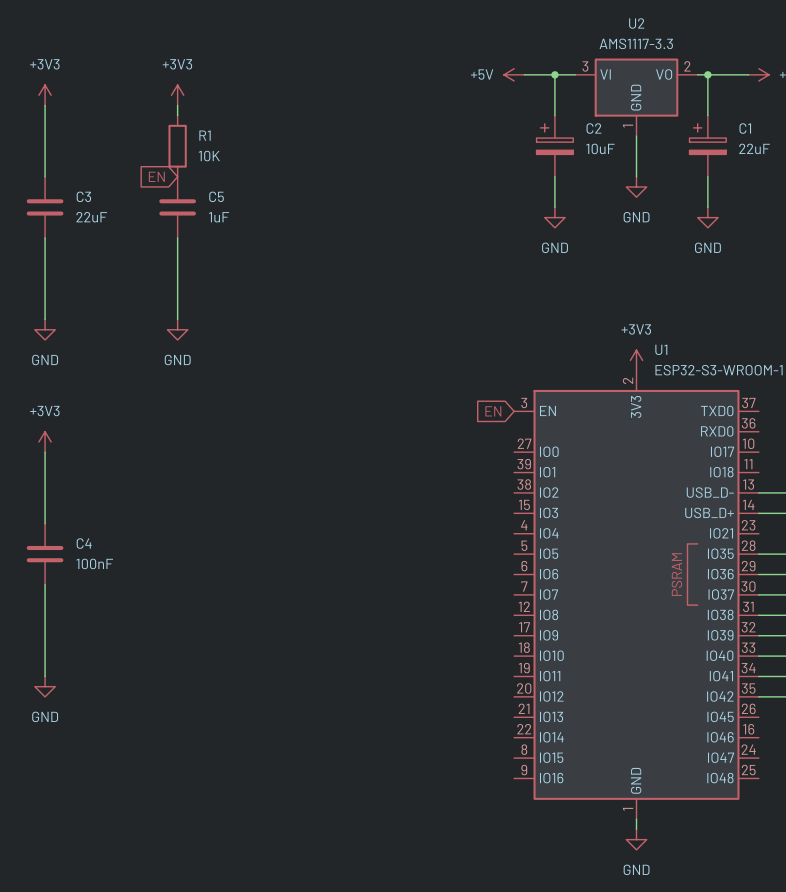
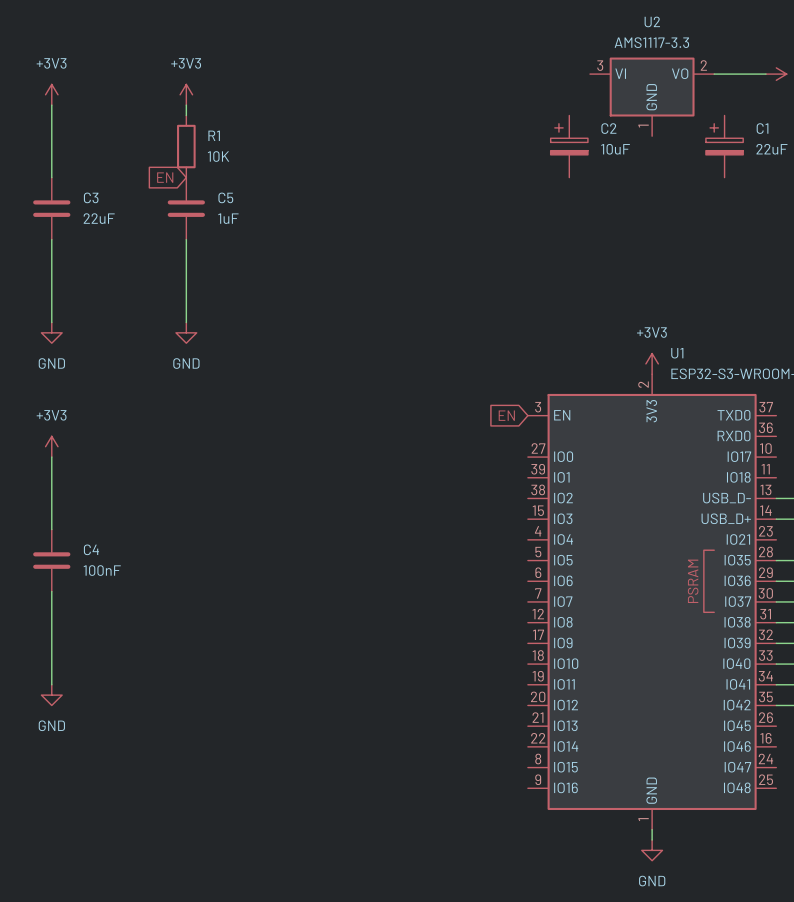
power symbol: +5V (514, 74) -> none
wire: (524, 74) (575, 74) -> none
wire: (554, 74) (554, 115) -> none
junction: (554, 74) -> none
wire: (707, 74) (707, 115) -> none
junction: (707, 74) -> none
wire: (636, 136) (636, 176) -> none
wire: (554, 176) (554, 207) -> none
wire: (707, 176) (707, 207) -> none
power symbol: GND (636, 187) -> none
power symbol: GND (554, 217) -> none
power symbol: GND (707, 217) -> none

